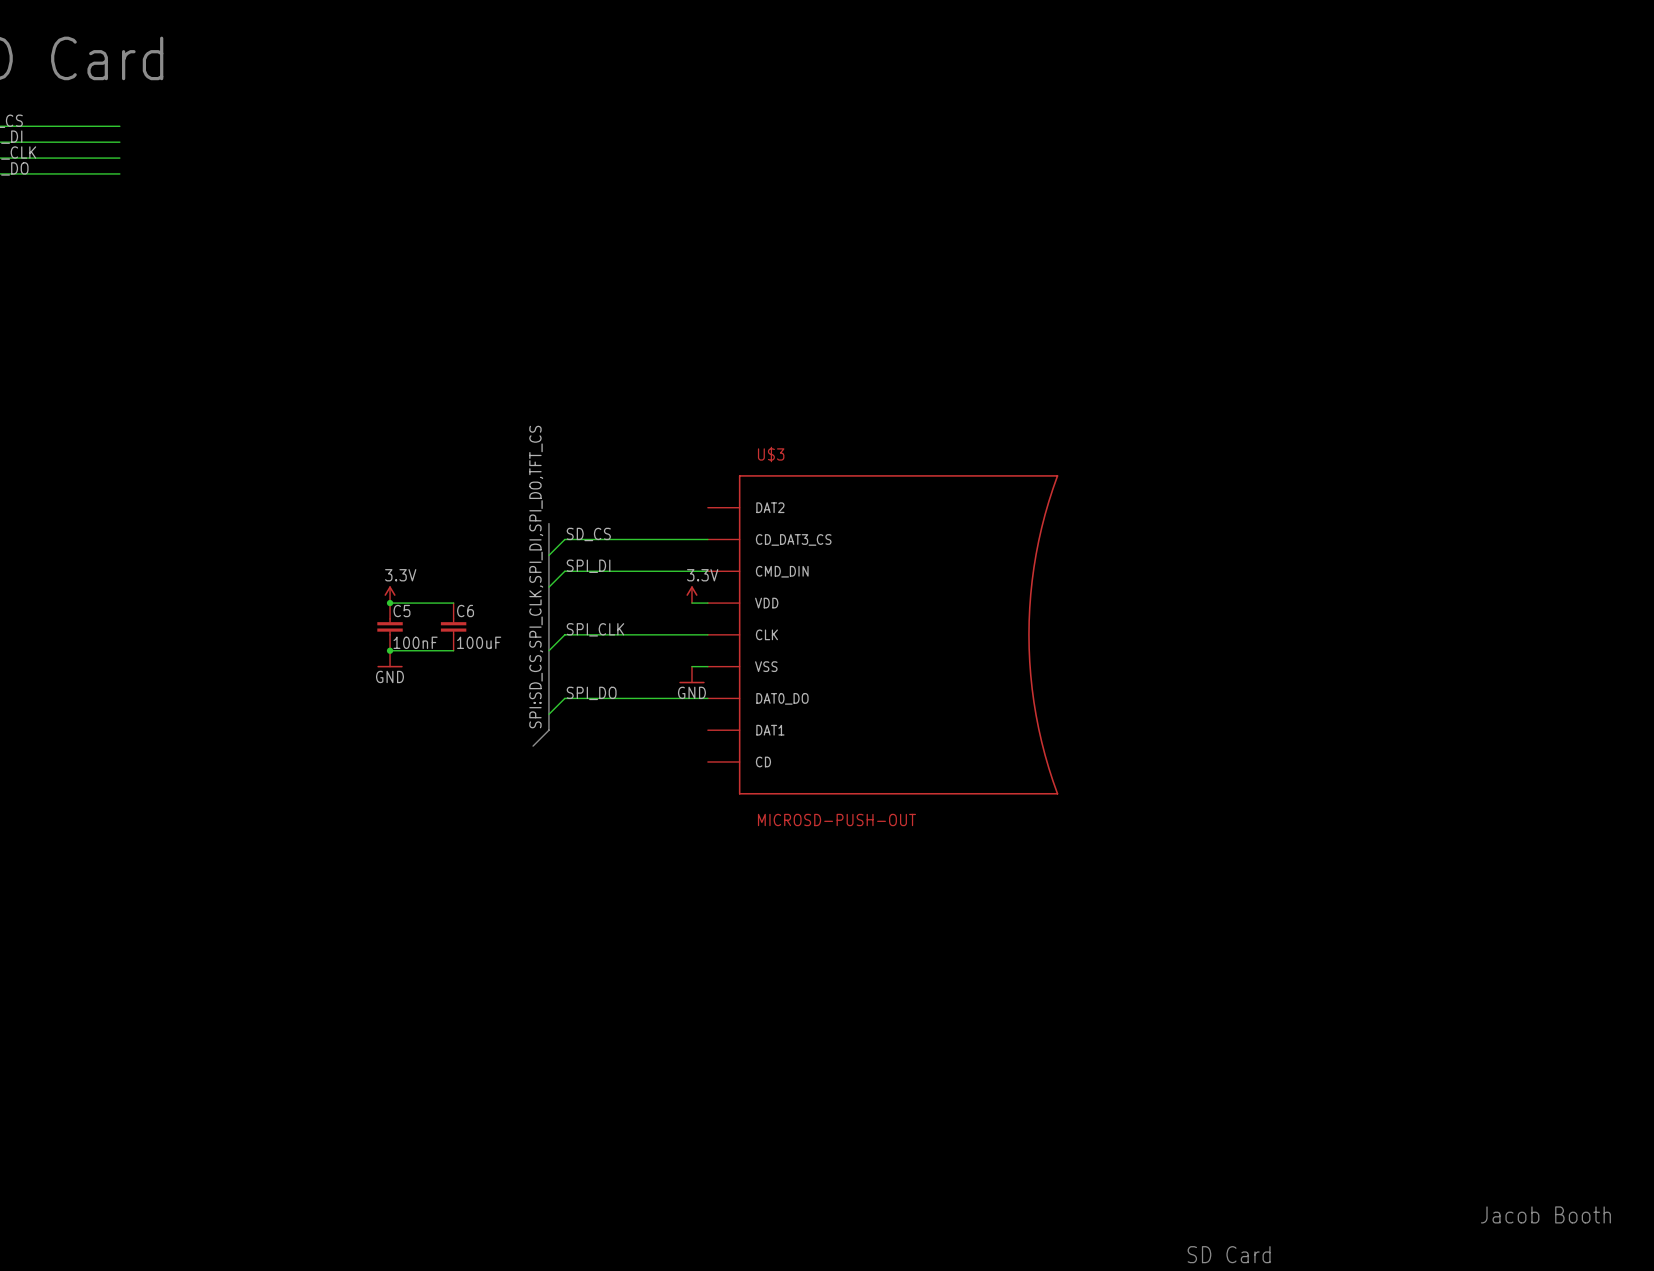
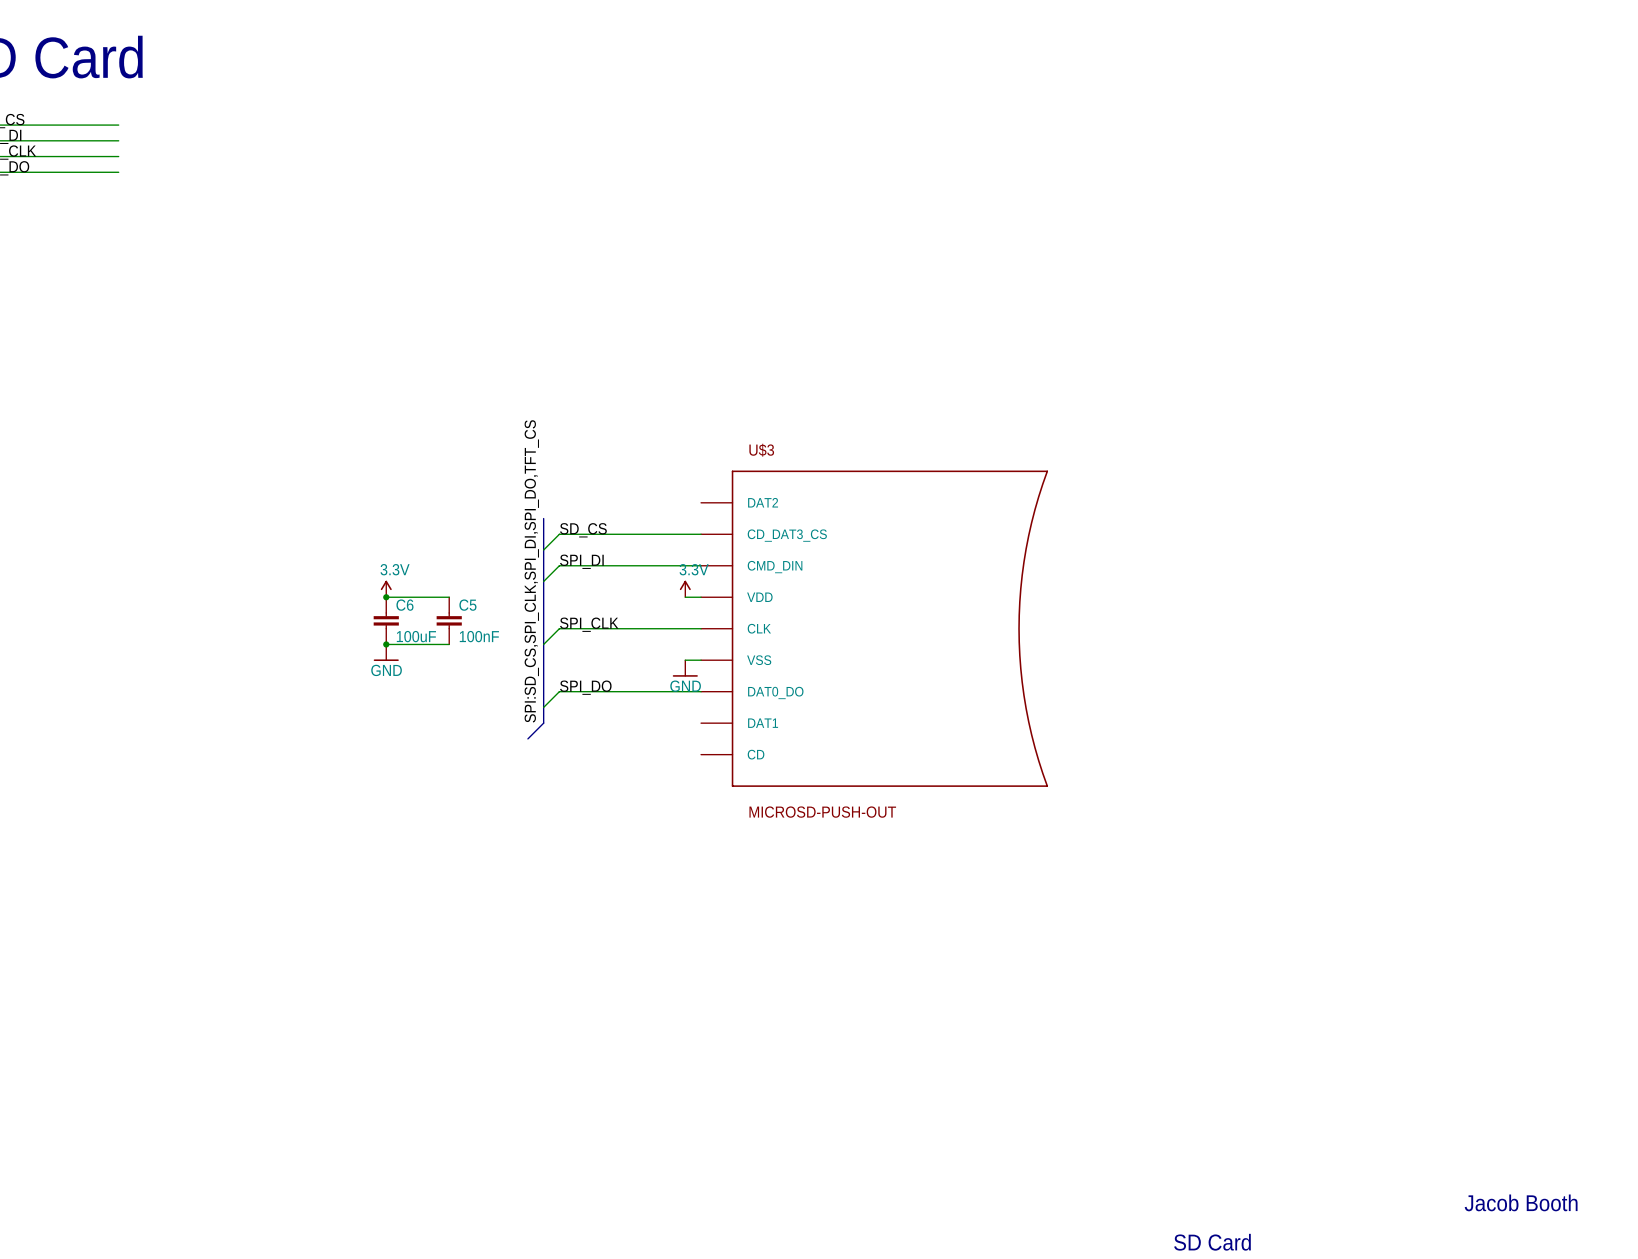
C5 name: C5 (401, 611) -> C6 (404, 605)
C6 name: C6 (465, 611) -> C5 (467, 605)
C5 value: 100nF (415, 642) -> 100uF (416, 636)
C6 value: 100uF (479, 642) -> 100nF (479, 636)

